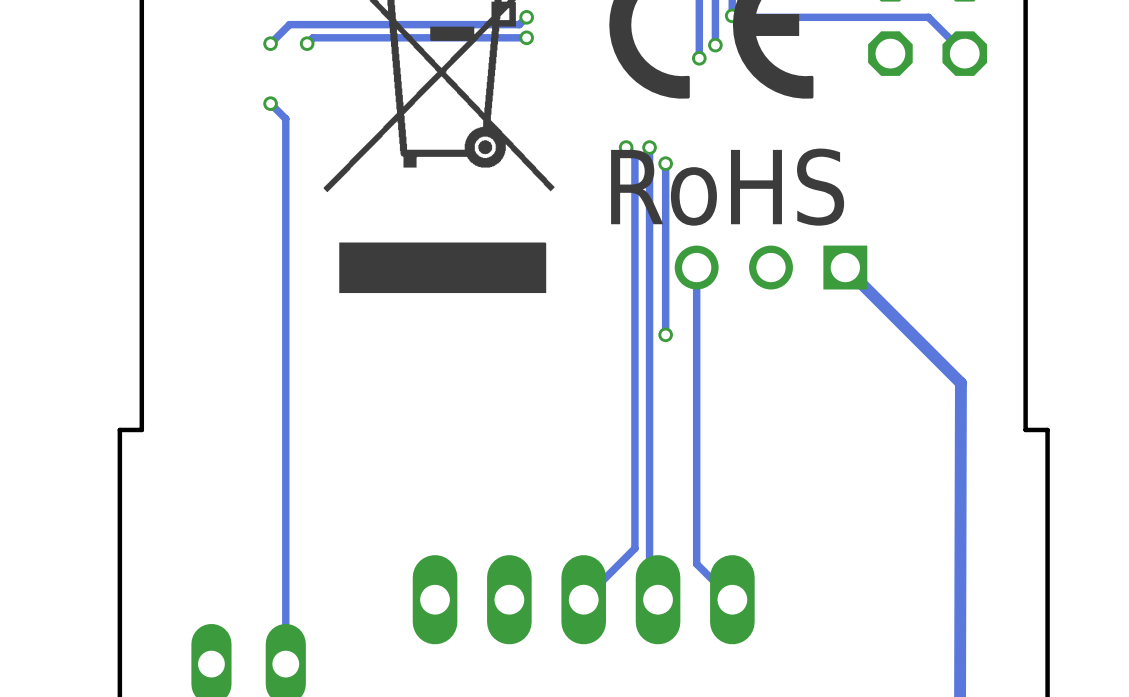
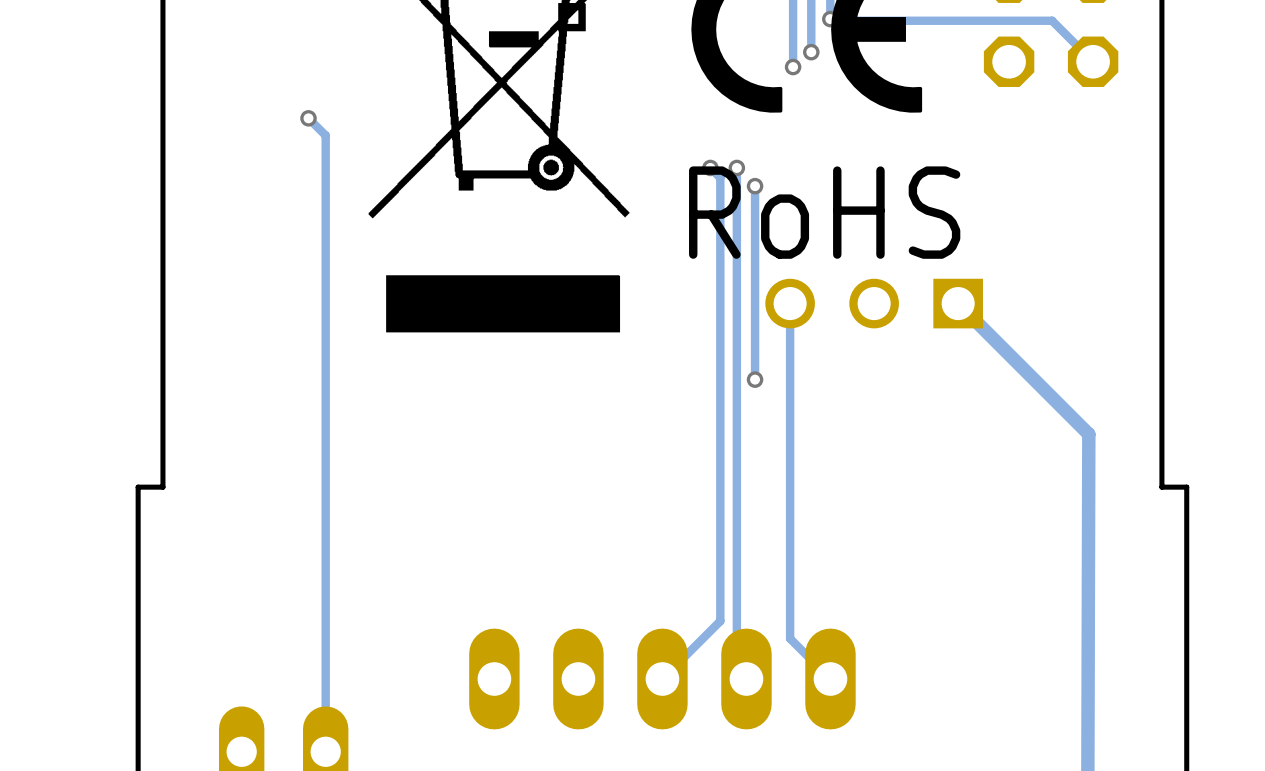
track: (526, 17) (519, 24) (289, 24) (270, 43) -> none
via: (526, 17) -> none
track: (526, 37) (313, 37) (307, 43) -> none
via: (526, 37) -> none
via: (270, 43) -> none
via: (307, 43) -> none

